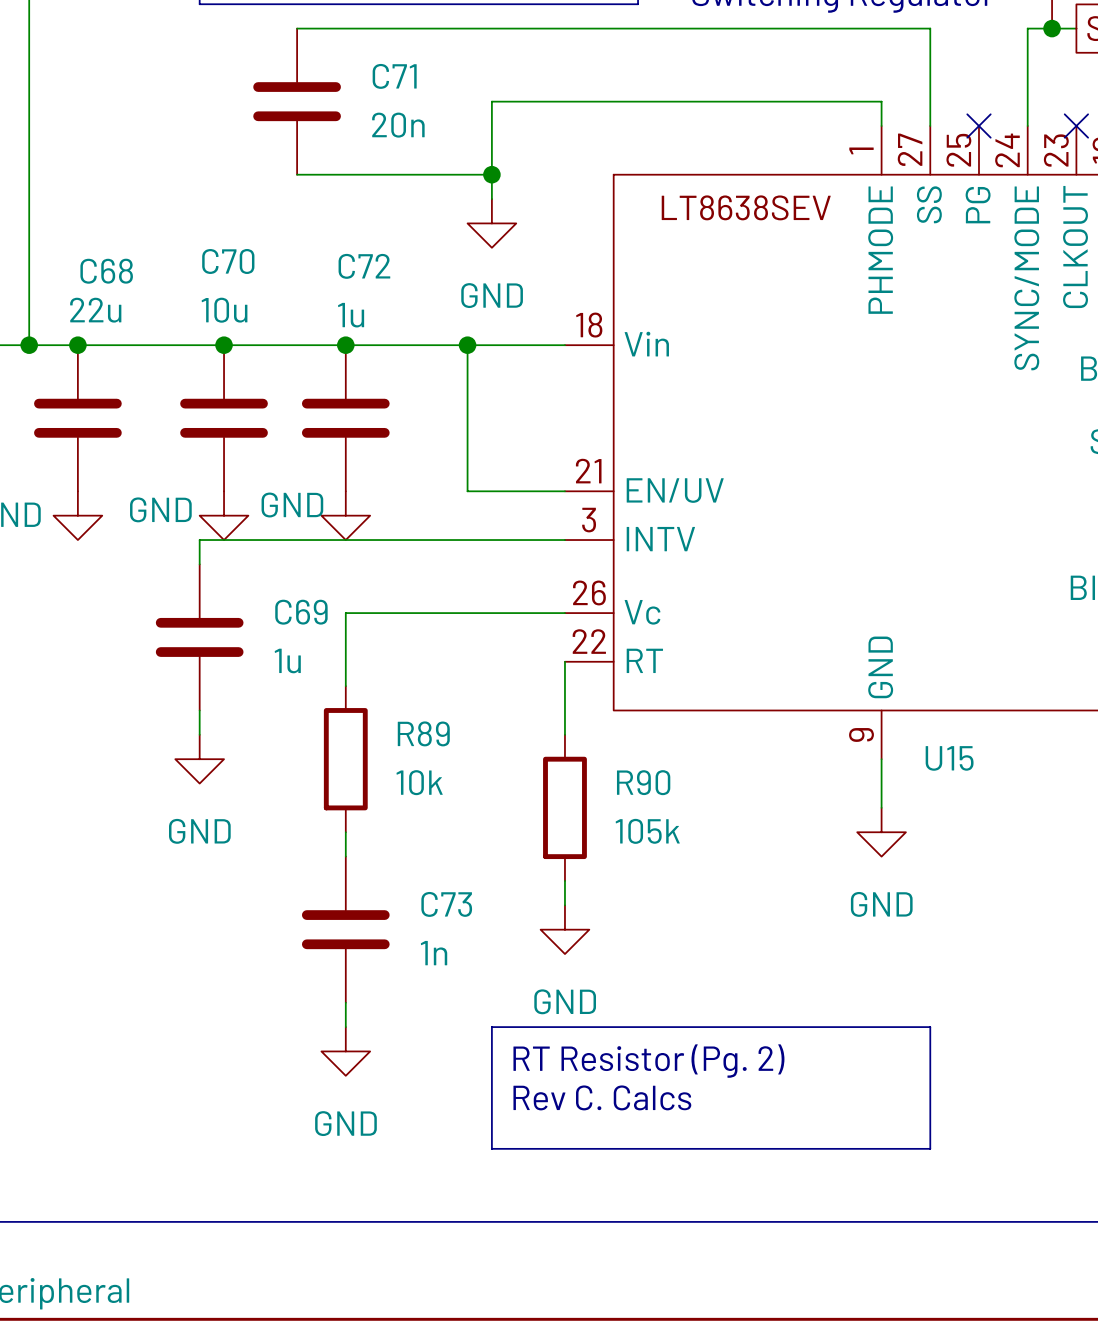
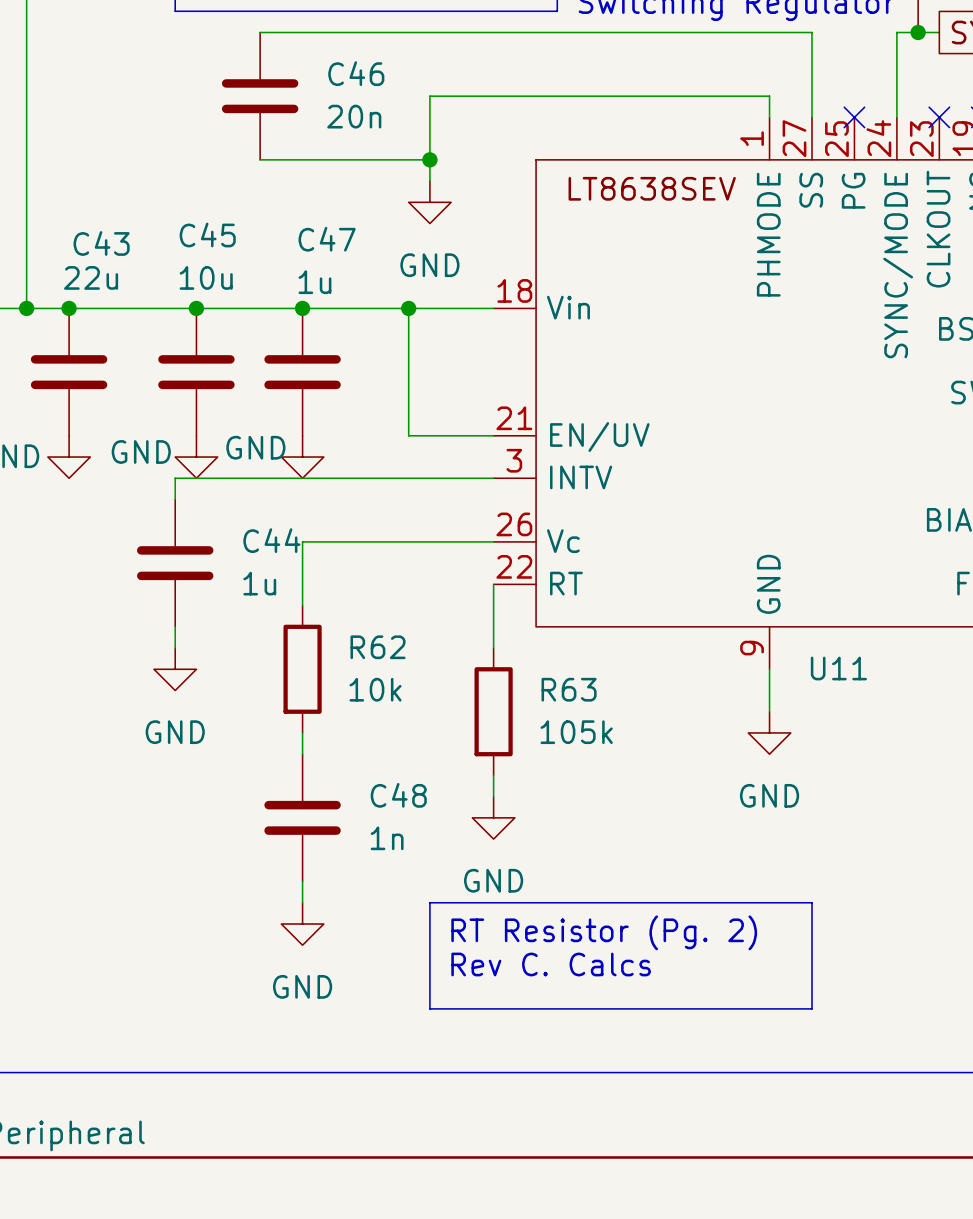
C71 name: C71 (394, 76) -> C46 (356, 73)
C70 name: C70 (228, 261) -> C45 (207, 234)
C72 name: C72 (364, 266) -> C47 (327, 239)
C68 name: C68 (106, 271) -> C43 (101, 243)
C69 name: C69 (301, 612) -> C44 (271, 540)
R89 name: R89 (423, 733) -> R62 (378, 647)
U15 name: U15 (949, 758) -> U11 (838, 668)
R90 name: R90 (643, 782) -> R63 (569, 689)
C73 name: C73 (446, 904) -> C48 (398, 795)

